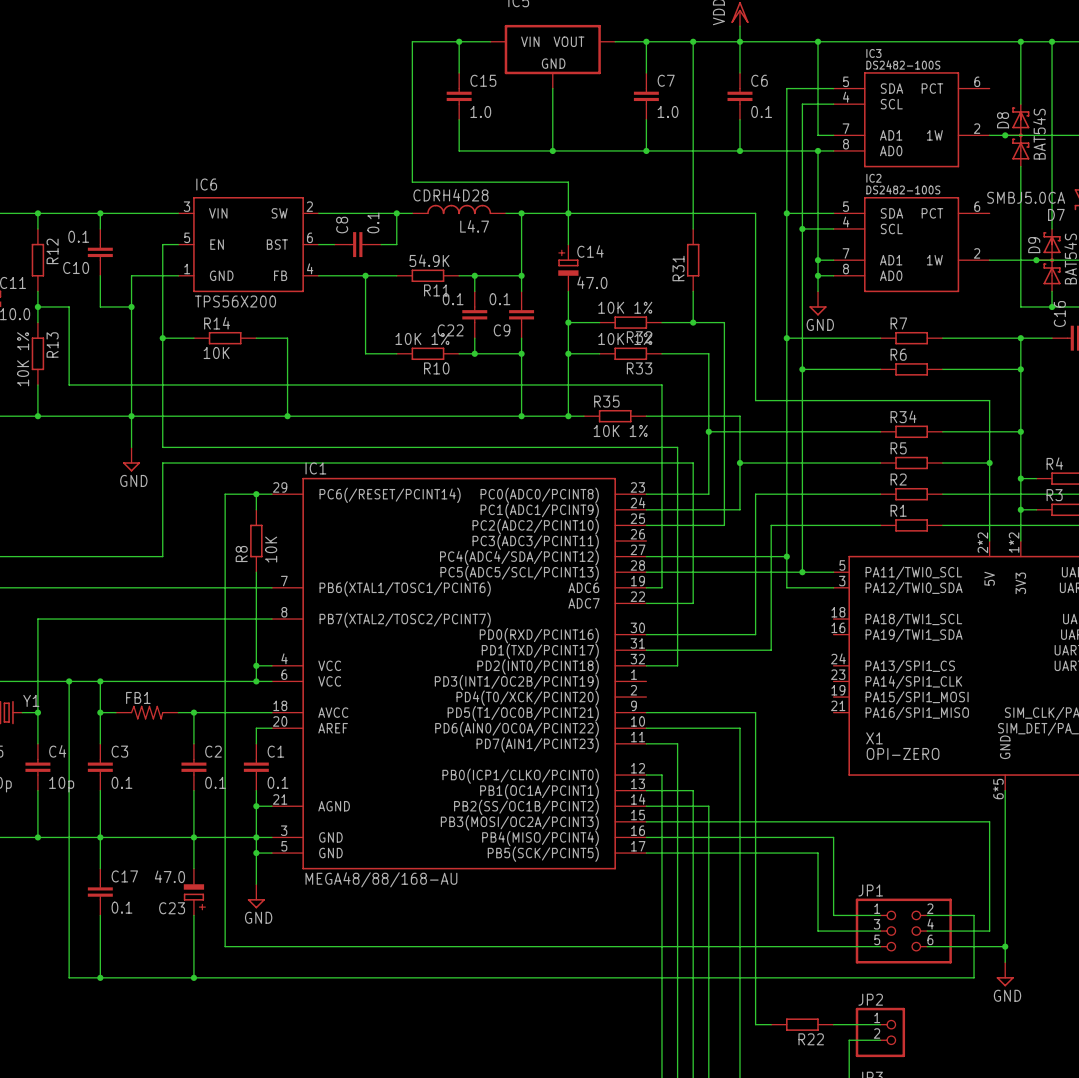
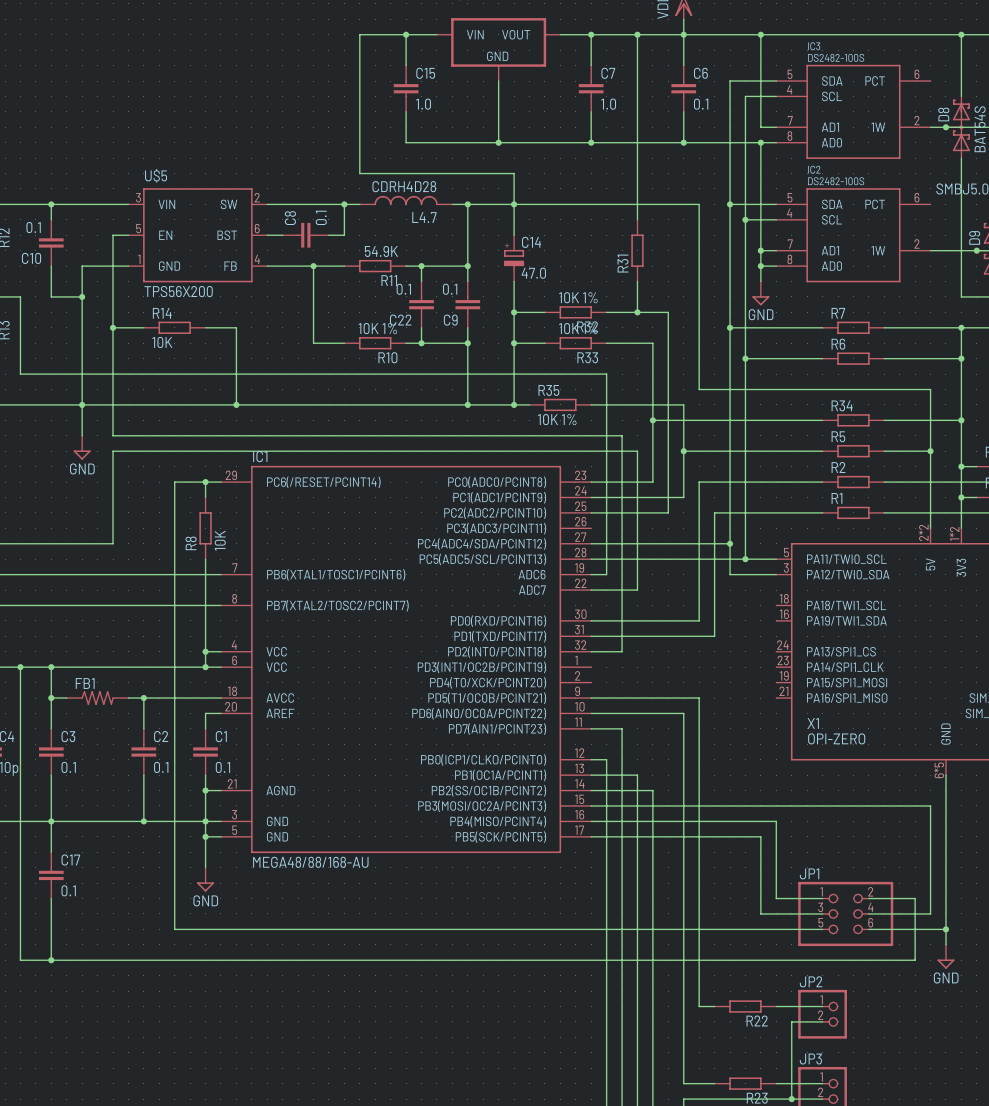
IC6 name: IC6 (206, 184) -> U$5 (156, 175)
wire: (193, 837) (193, 868) -> none
C23: 47.0 (193, 892) -> none
wire: (193, 915) (193, 977) -> none
junction: (193, 977) -> none

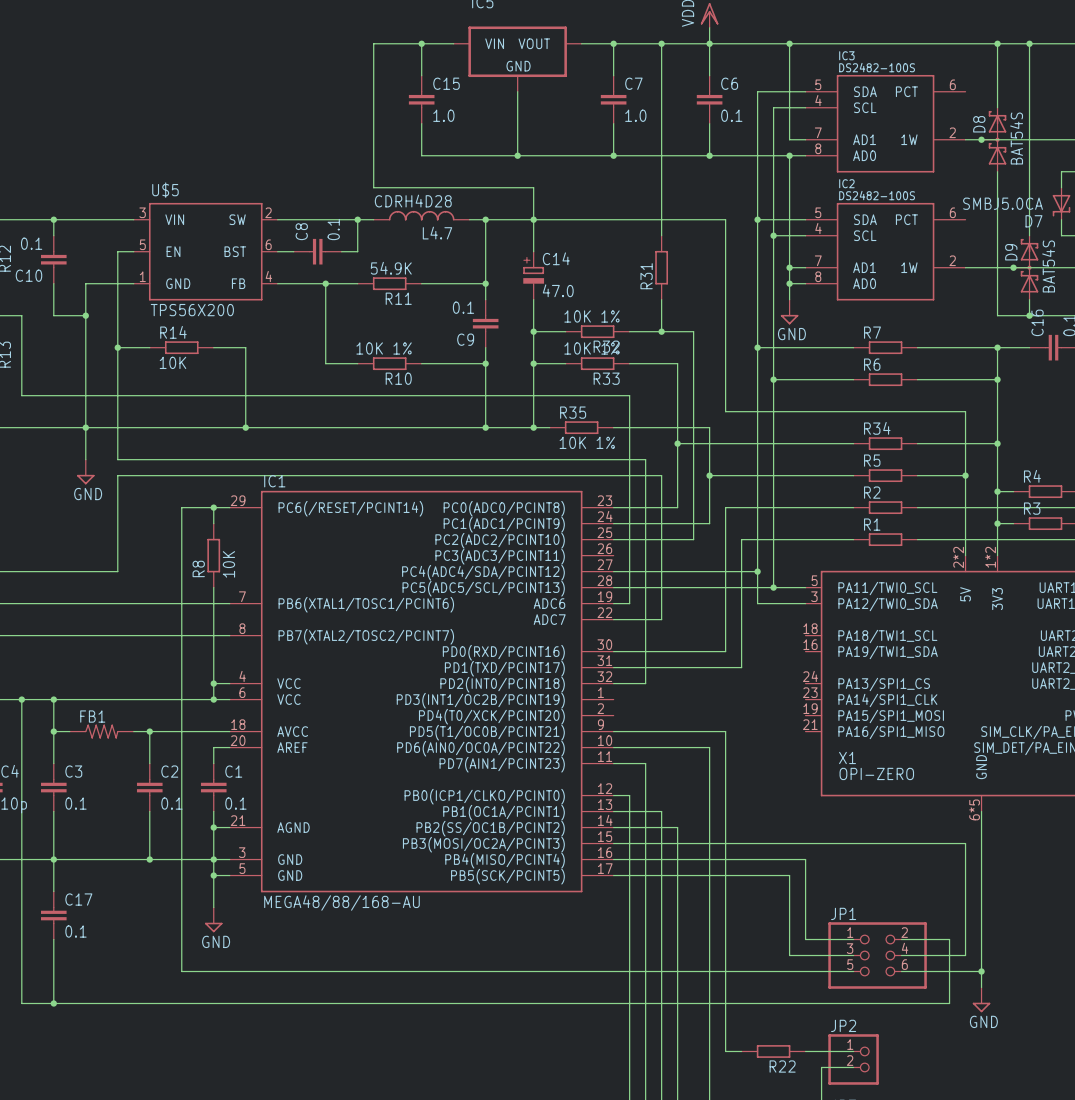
wire: (421, 266) (421, 281) -> none
junction: (421, 266) -> none
C22: 0.1 (421, 304) -> none
wire: (421, 327) (421, 343) -> none
junction: (421, 343) -> none

